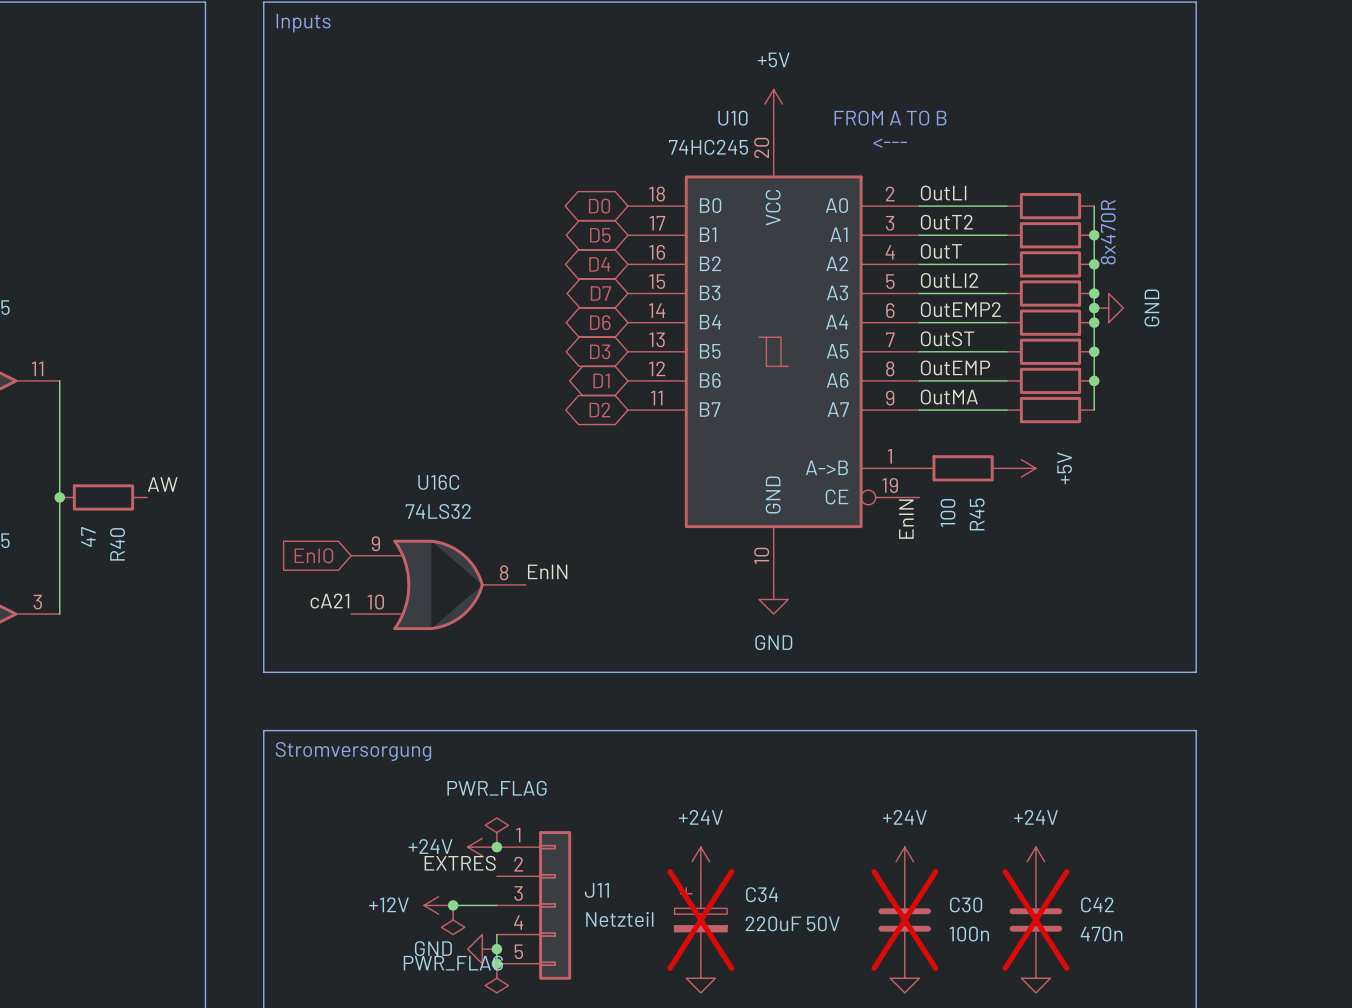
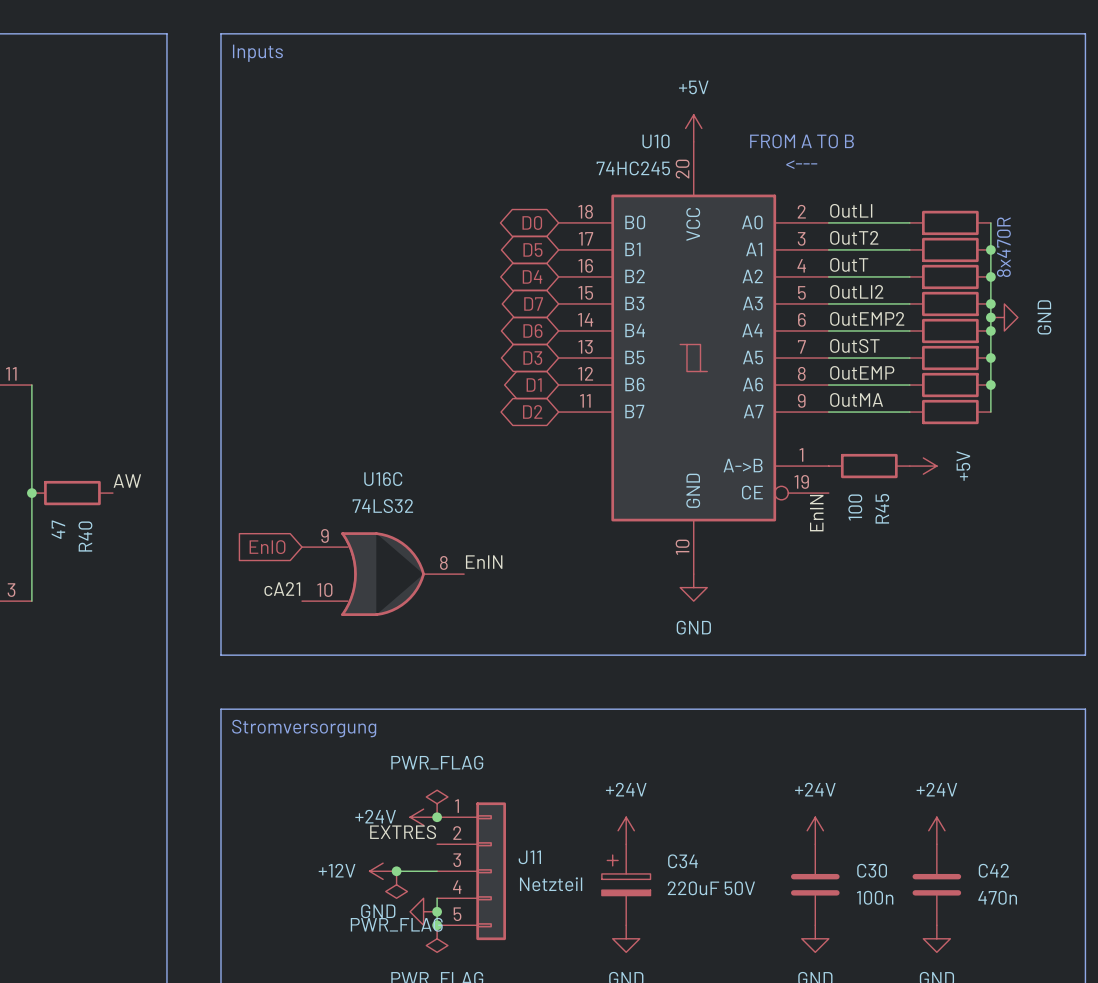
C34 do-not-place cross: (700, 920) -> none
C30 do-not-place cross: (904, 920) -> none
C42 do-not-place cross: (1035, 920) -> none

